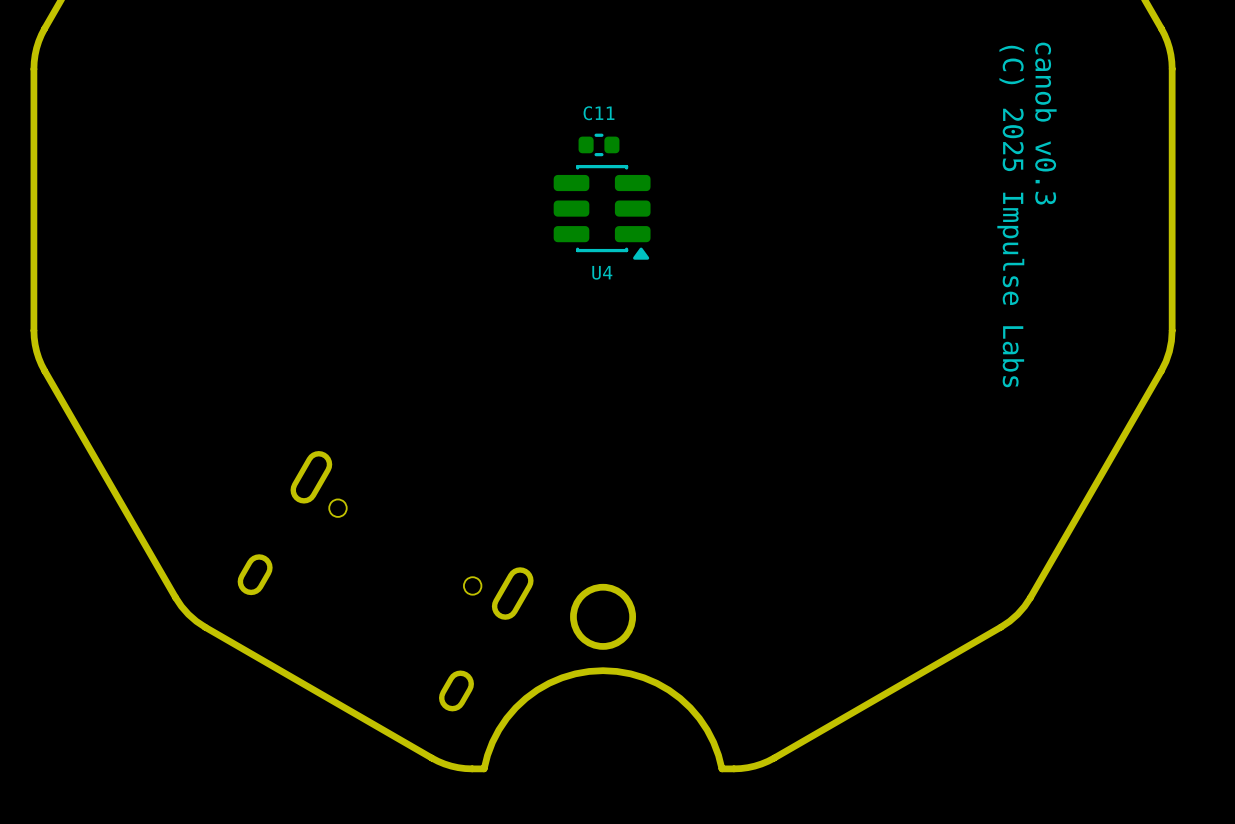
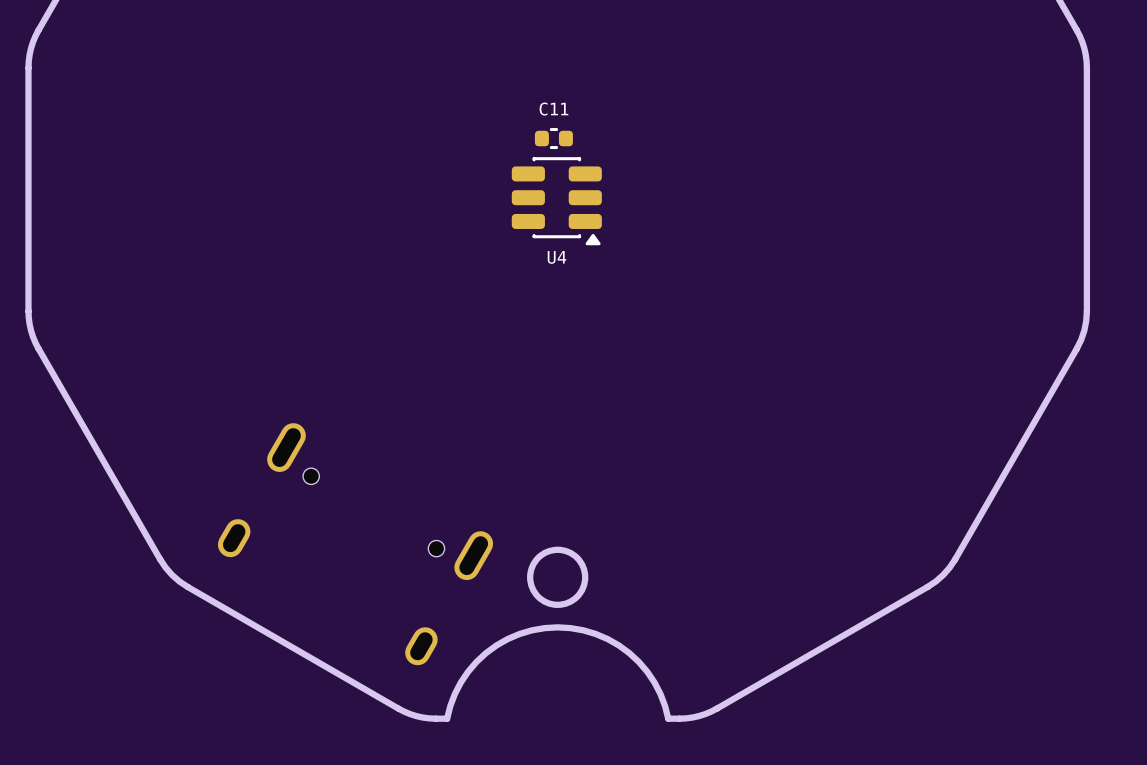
text: canob v0.3 (1045, 123) -> none
text: (C) 2025 Impulse Labs (1010, 216) -> none

